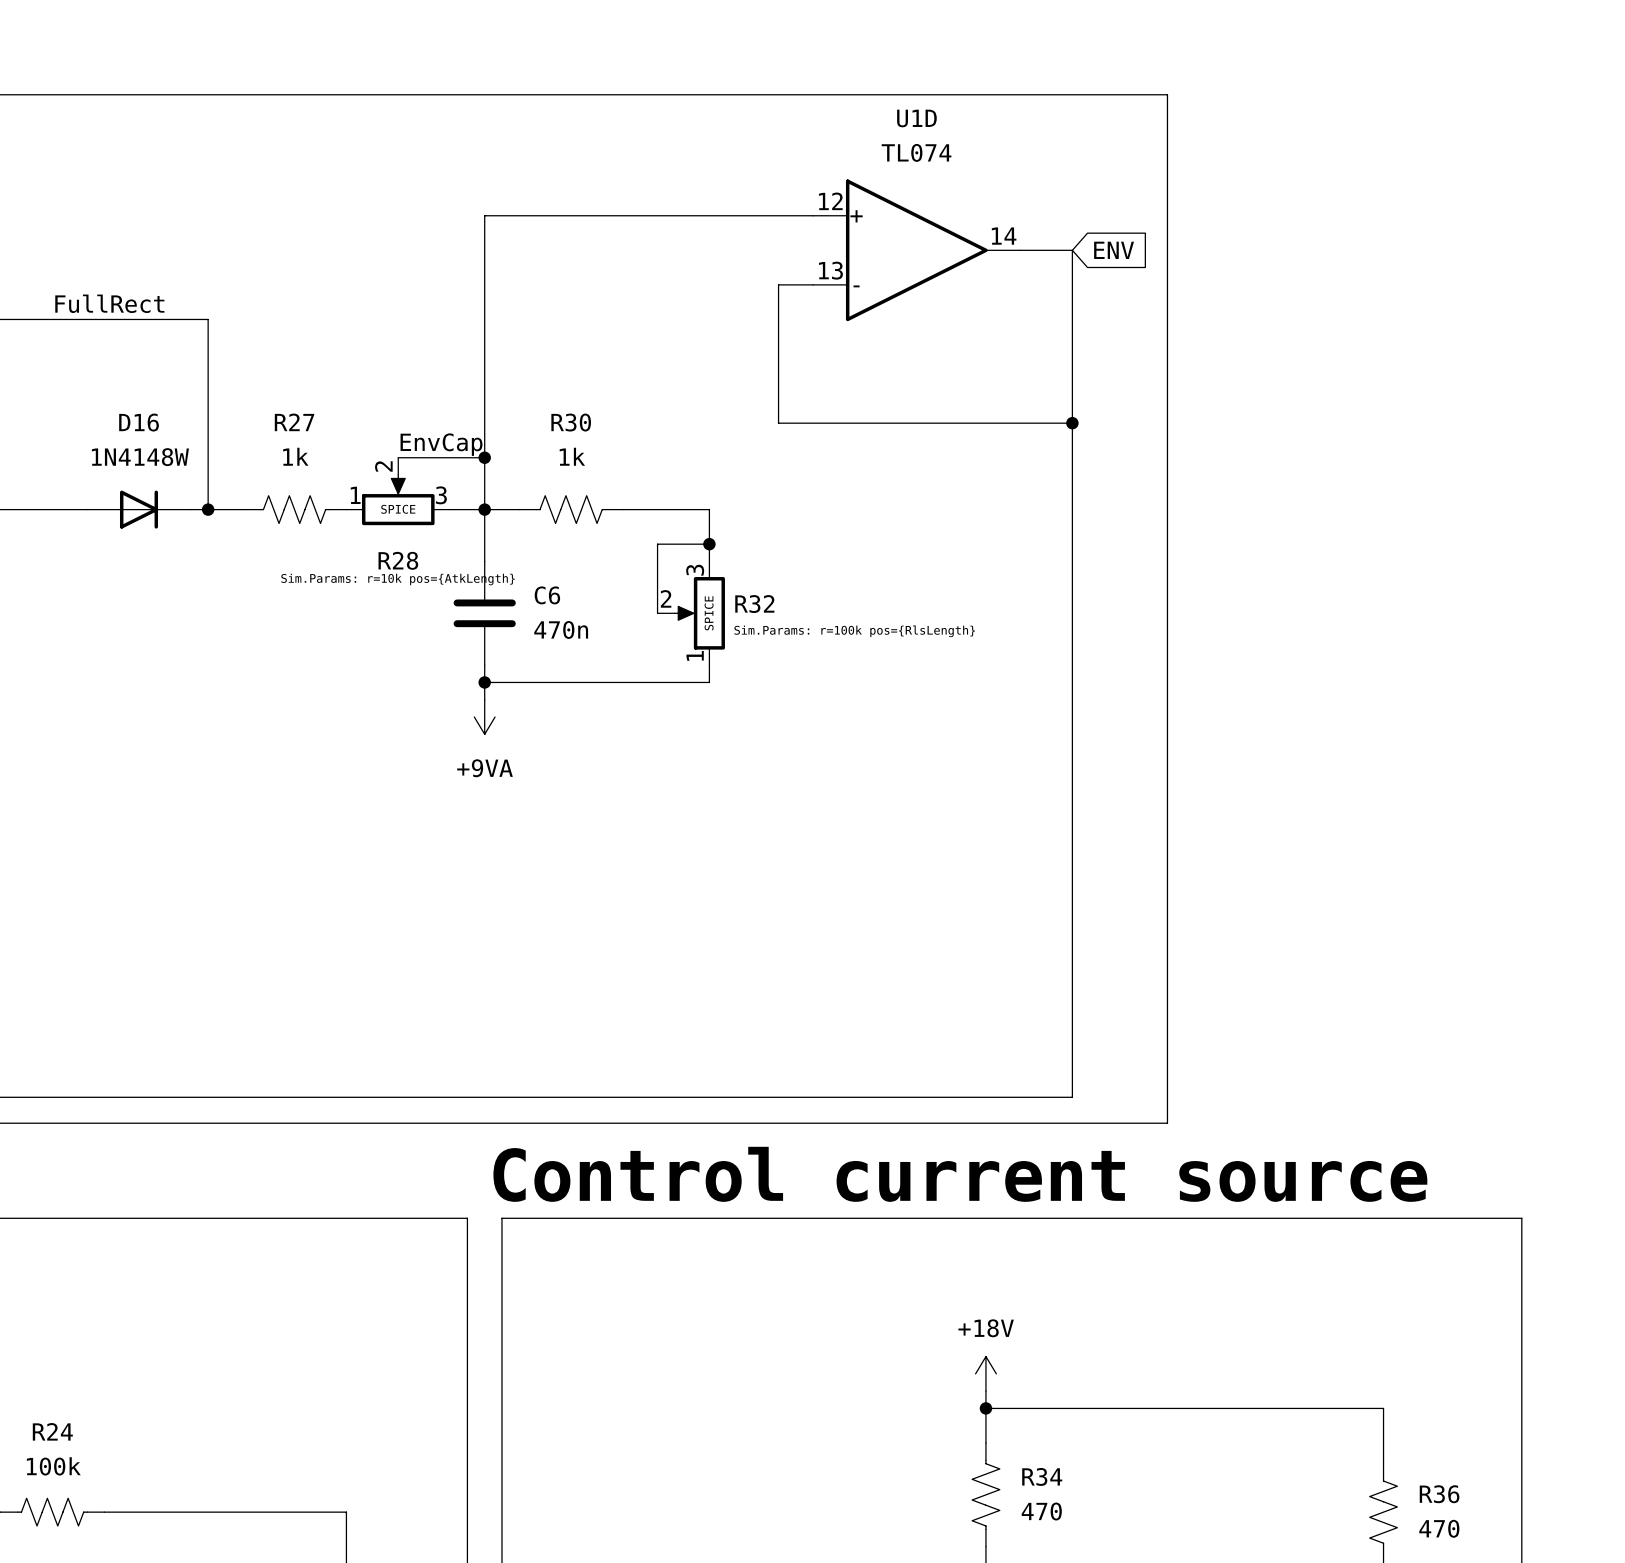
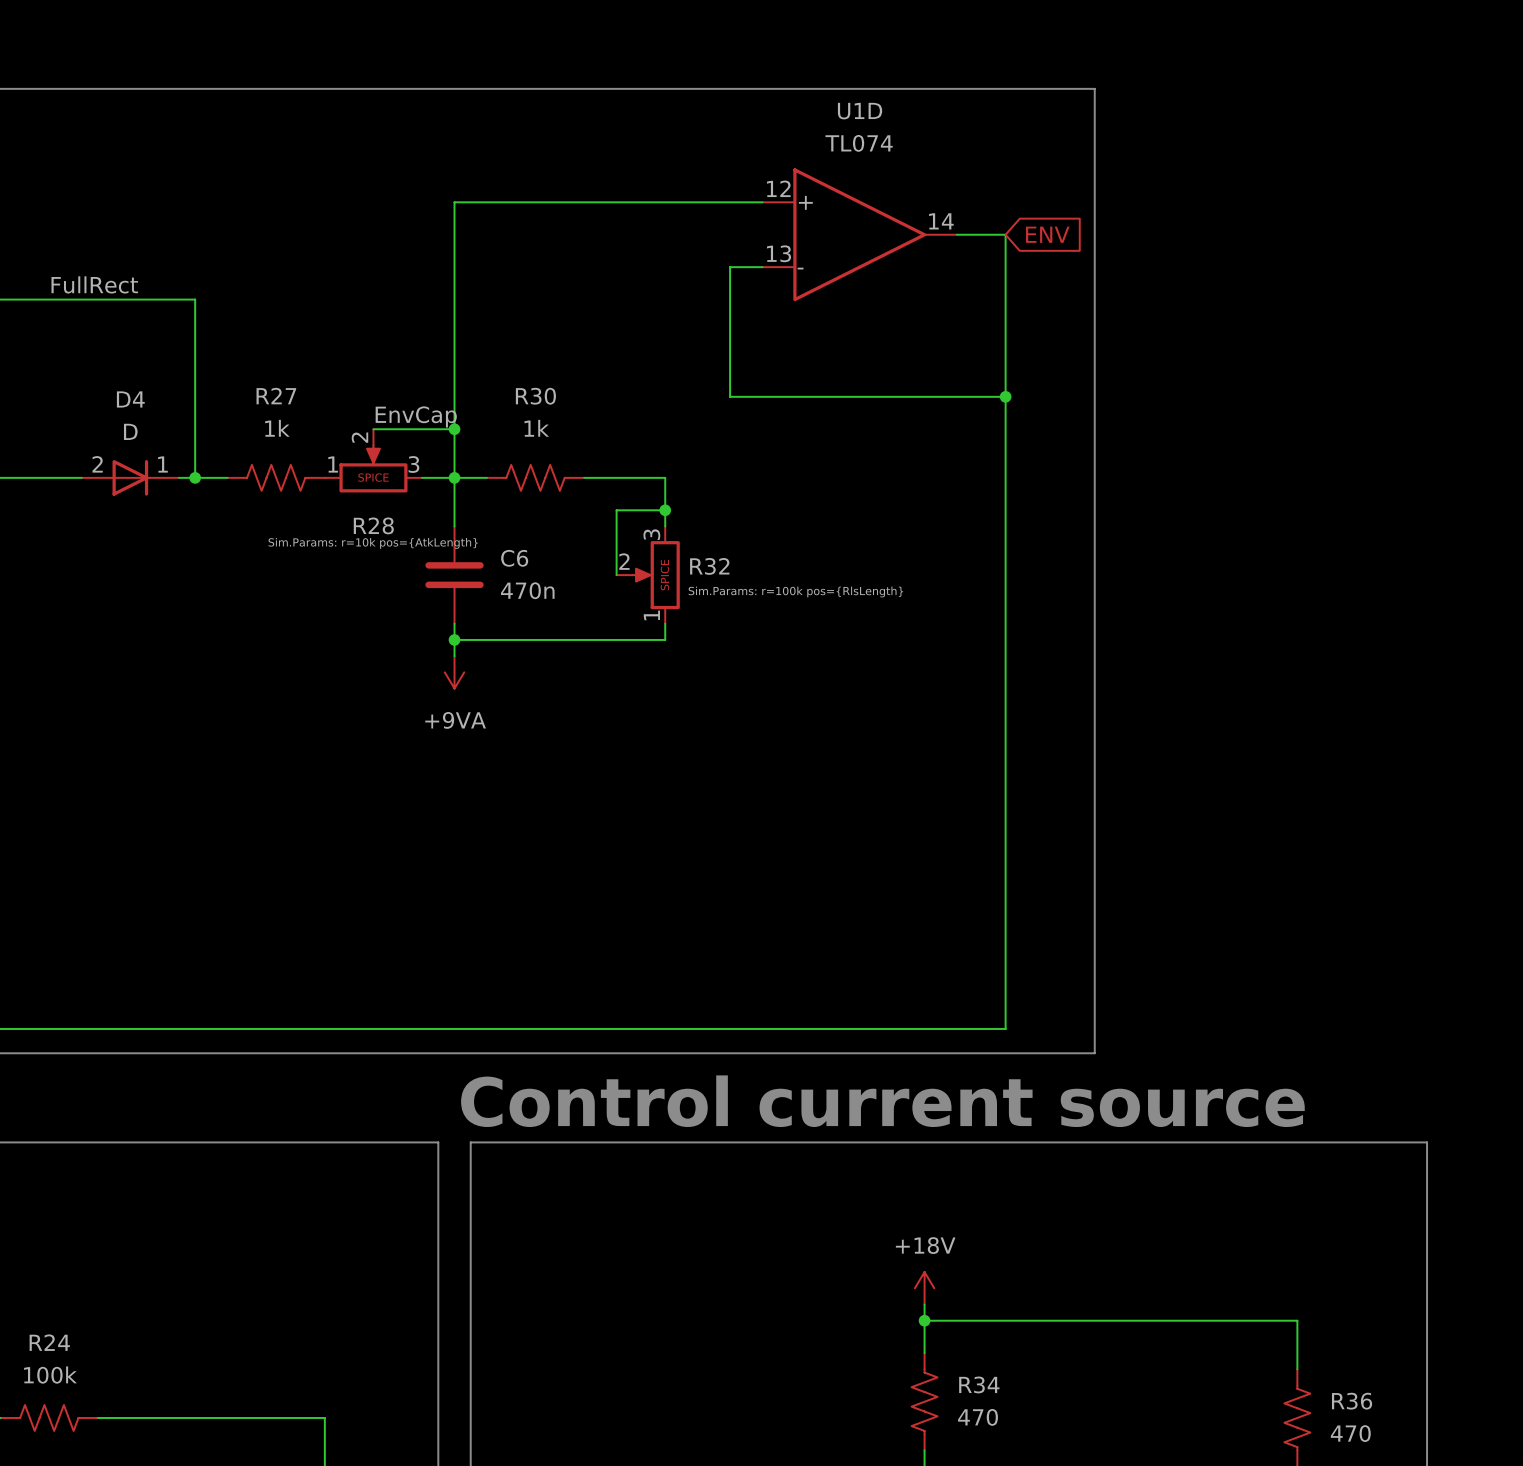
D16 name: D16 (139, 422) -> D4 (130, 399)
D16 value: 1N4148W (140, 457) -> D (130, 431)
D16 pin number: none -> 2 (97, 464)
D16 pin number: none -> 1 (162, 464)

